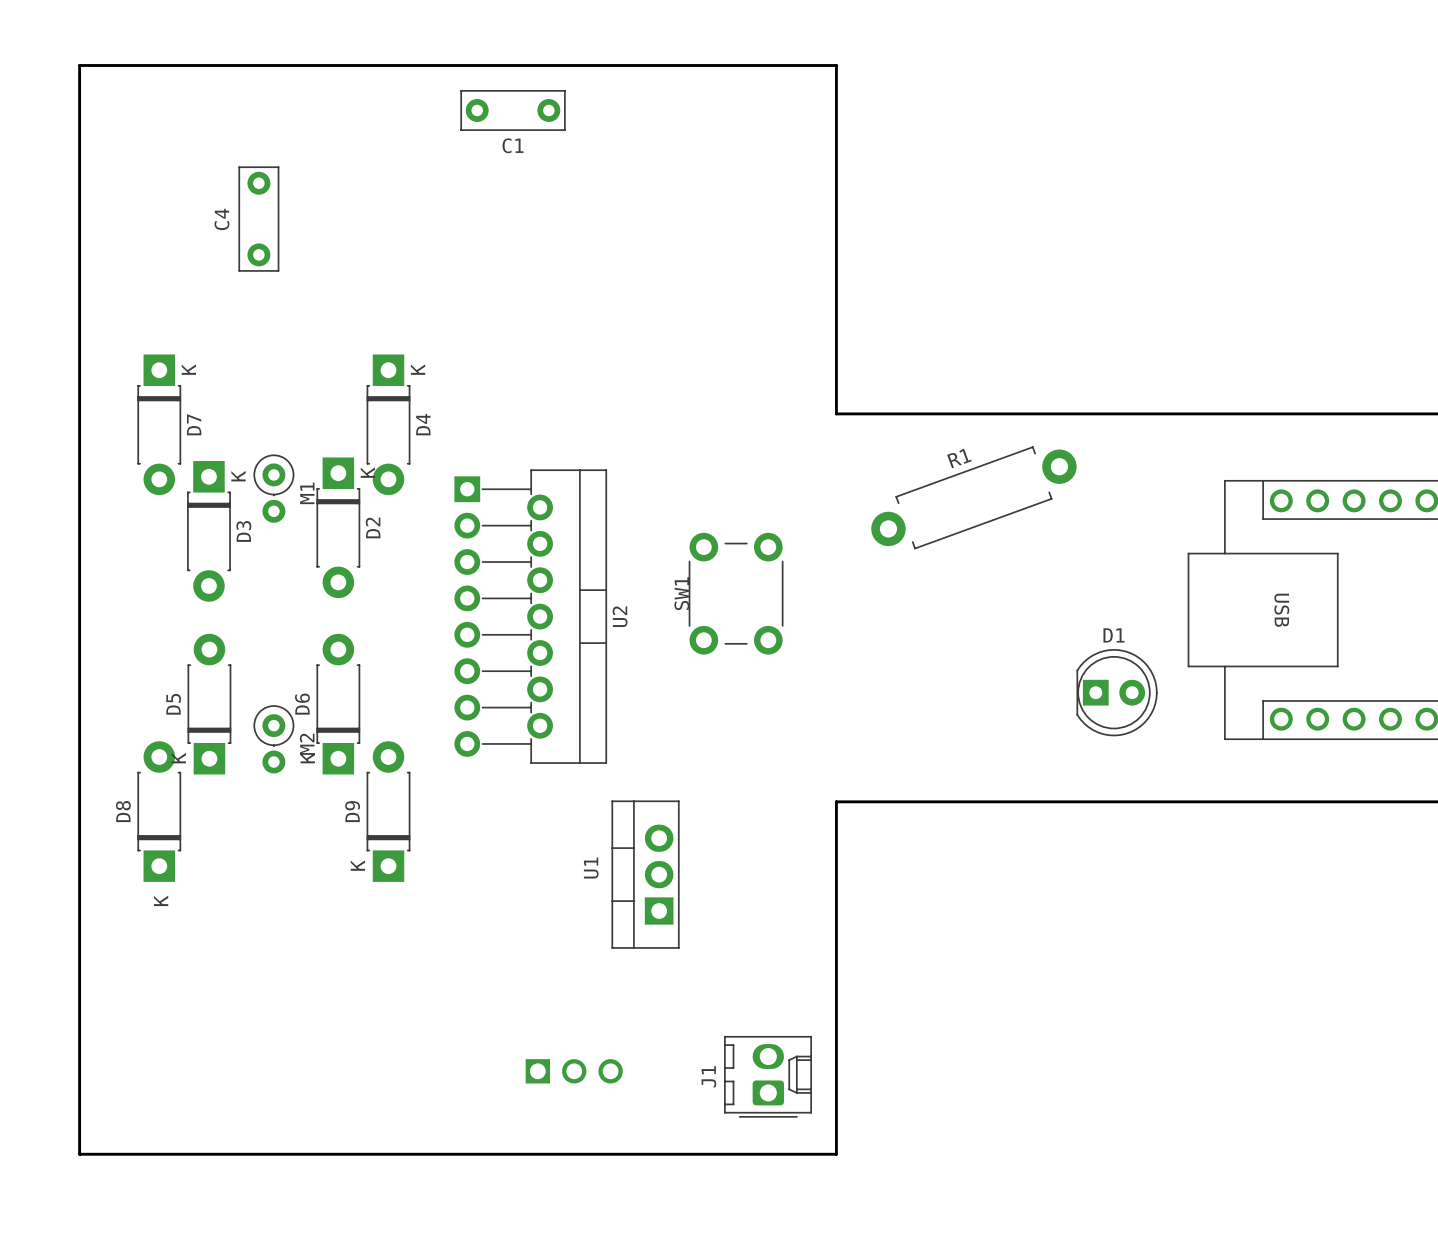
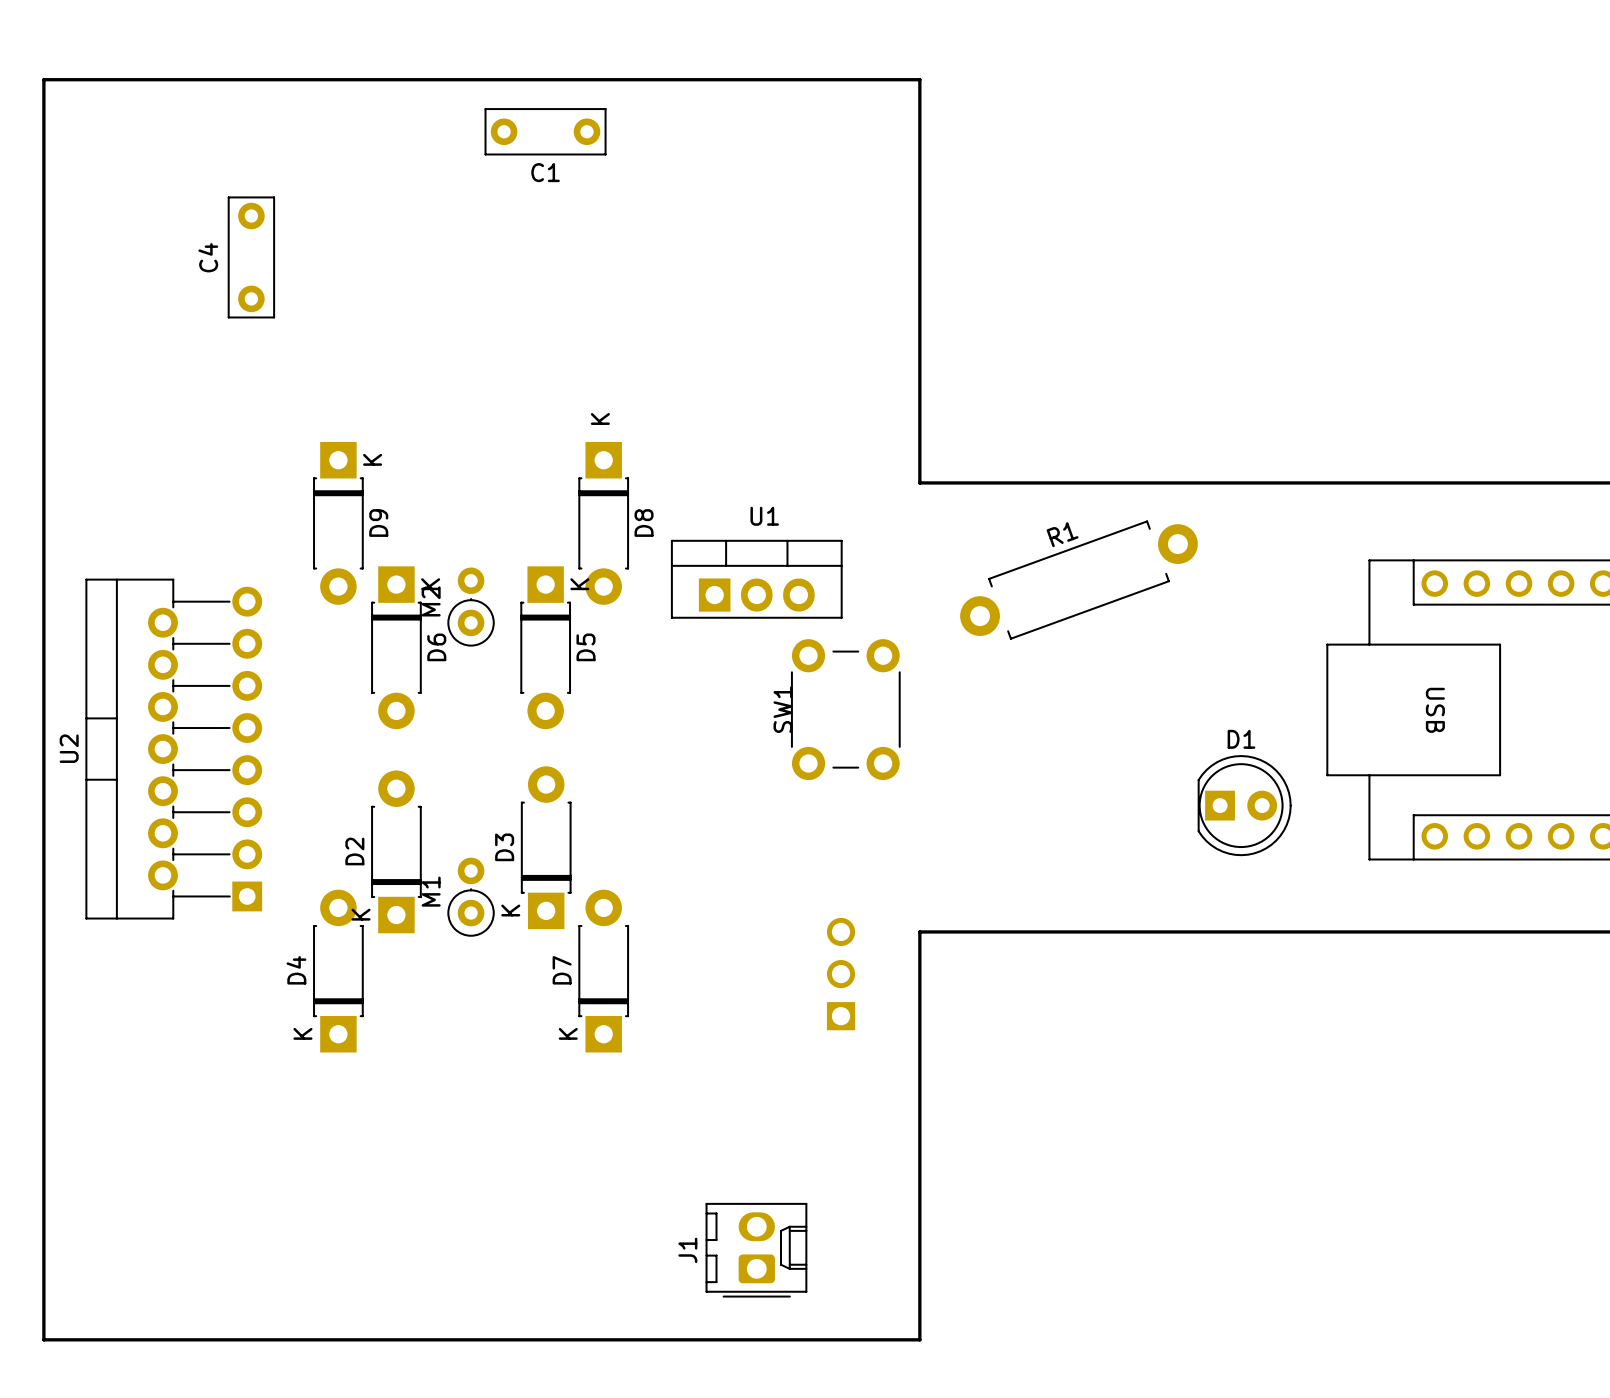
D7 rotation: 0° (159, 424) -> 180° (603, 971)
D7 position: (159, 424) -> (603, 971)
D4 rotation: 0° (388, 424) -> 180° (338, 971)
D4 position: (388, 424) -> (338, 971)
U2 footprint: [454, 469, 608, 764] -> [85, 578, 263, 920]
M1 rotation: 0° (273, 488) -> 180° (471, 897)
M1 position: (273, 488) -> (471, 897)
D2 rotation: 0° (338, 527) -> 180° (396, 851)
D2 position: (338, 527) -> (396, 851)
D3 rotation: 0° (208, 531) -> 180° (546, 847)
D3 position: (208, 531) -> (546, 847)
SW1 position: (736, 593) -> (845, 709)
U2 name position: U2 (620, 616) -> U2 (69, 748)
D5 rotation: 0° (209, 704) -> 180° (545, 647)
D5 position: (209, 704) -> (545, 647)
D6 rotation: 0° (338, 704) -> 180° (396, 647)
D6 position: (338, 704) -> (396, 647)
M2 rotation: 0° (273, 739) -> 180° (471, 607)
M2 position: (273, 739) -> (471, 607)
D8 rotation: 0° (159, 811) -> 180° (603, 523)
D8 position: (159, 811) -> (603, 523)
D9 rotation: 0° (388, 811) -> 180° (338, 523)
D9 position: (388, 811) -> (338, 523)
U1 rotation: 0° (645, 874) -> 90° clockwise (756, 579)
U1 position: (645, 874) -> (756, 579)
part rotation: 0° (574, 1071) -> 90° counterclockwise (841, 974)
part position: (574, 1071) -> (841, 974)
J1 position: (768, 1076) -> (756, 1250)

